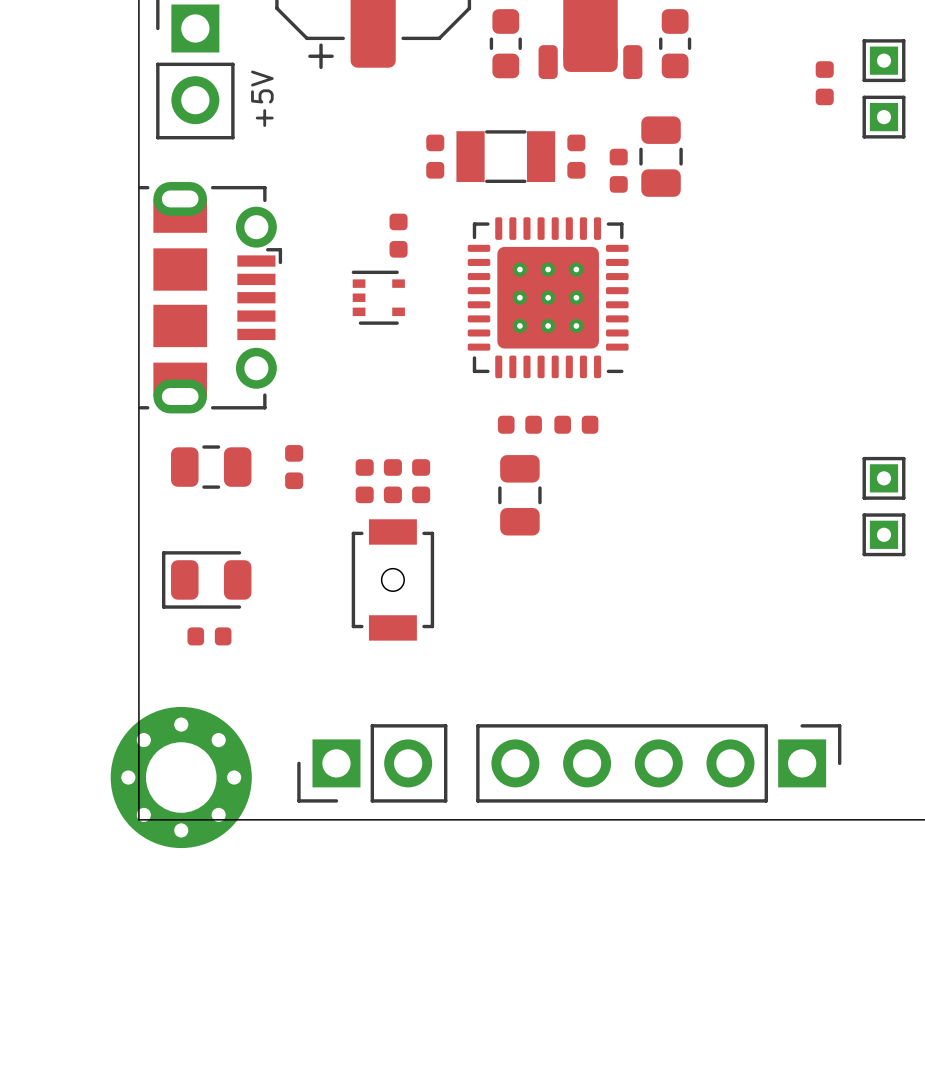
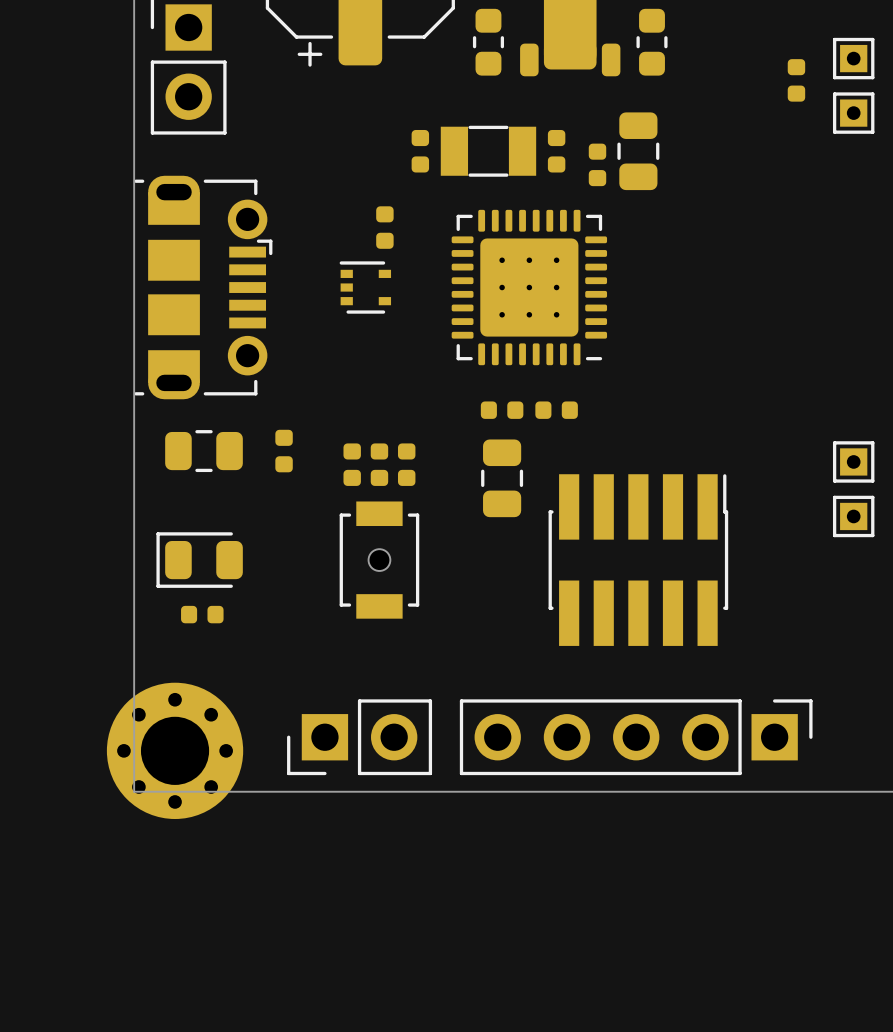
text: +5V (262, 98) -> none
part: none -> (638, 560)

